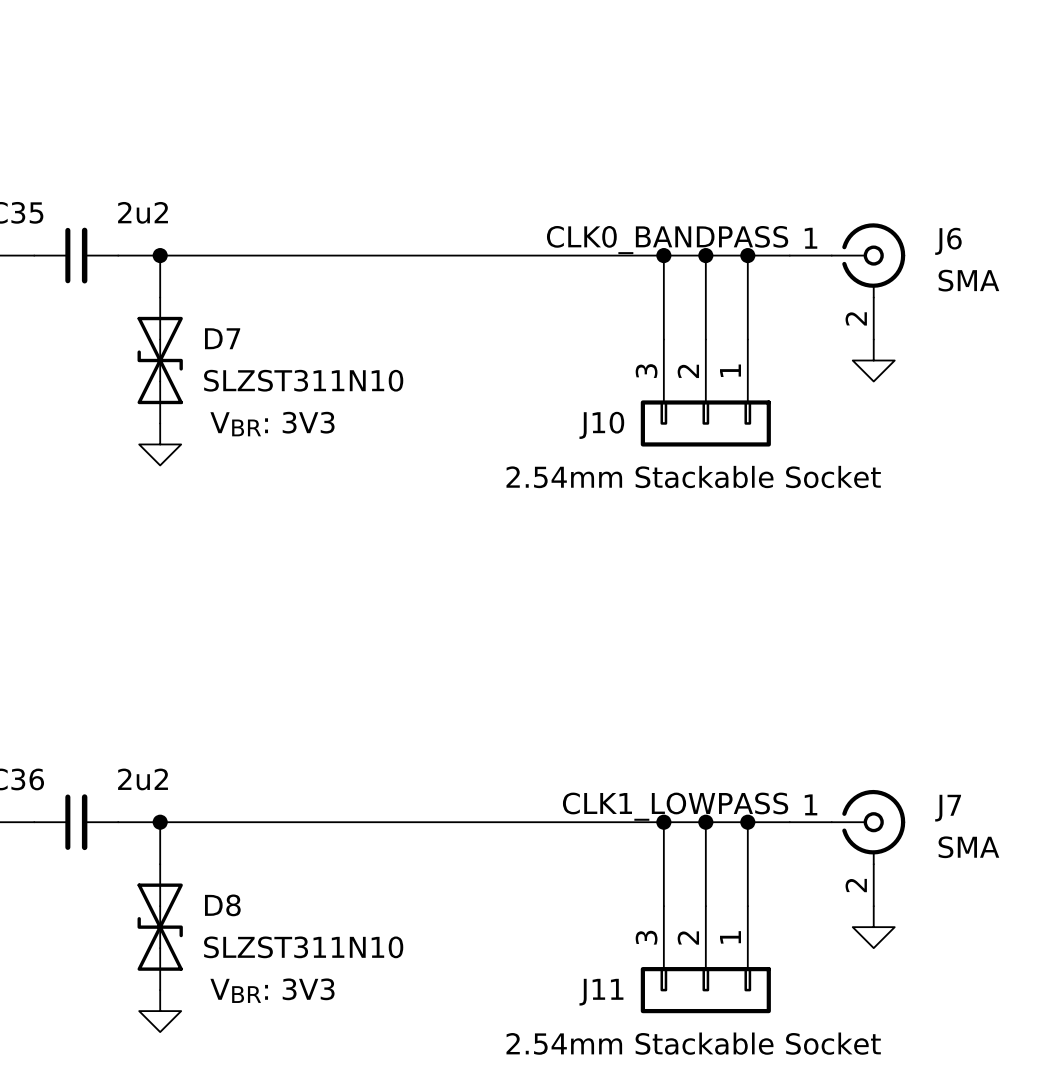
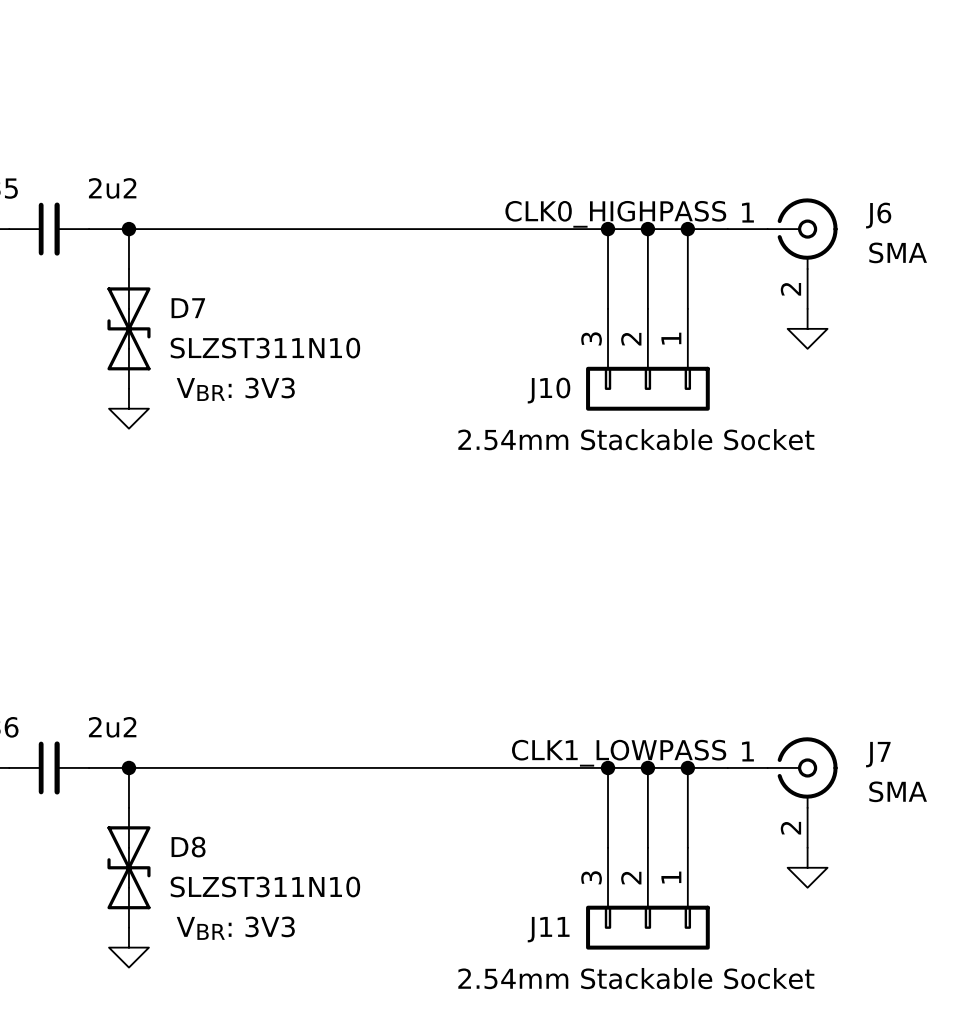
label: CLK0_BANDPASS (667, 240) -> CLK0_HIGHPASS (615, 214)

